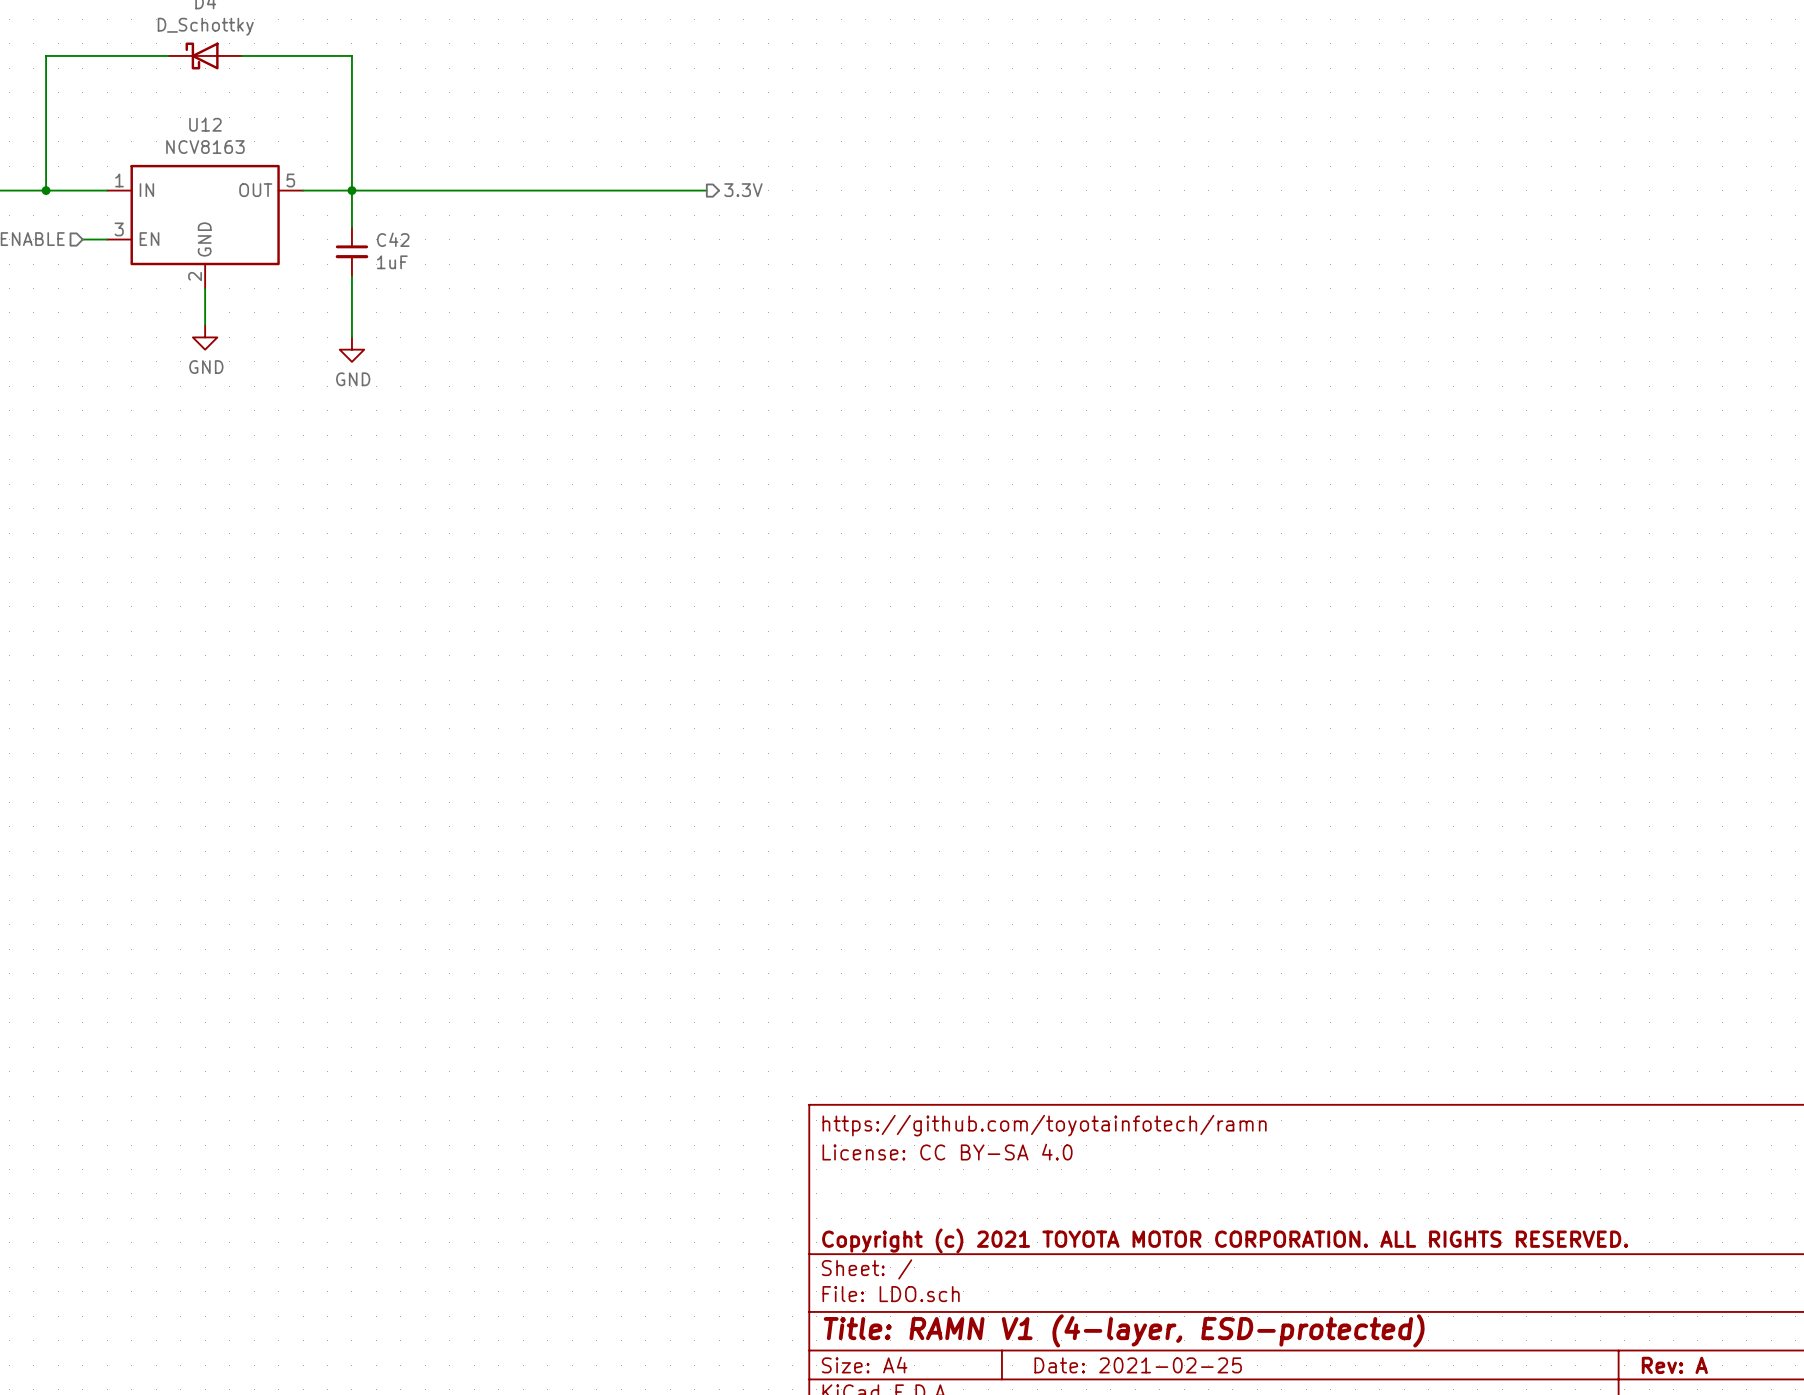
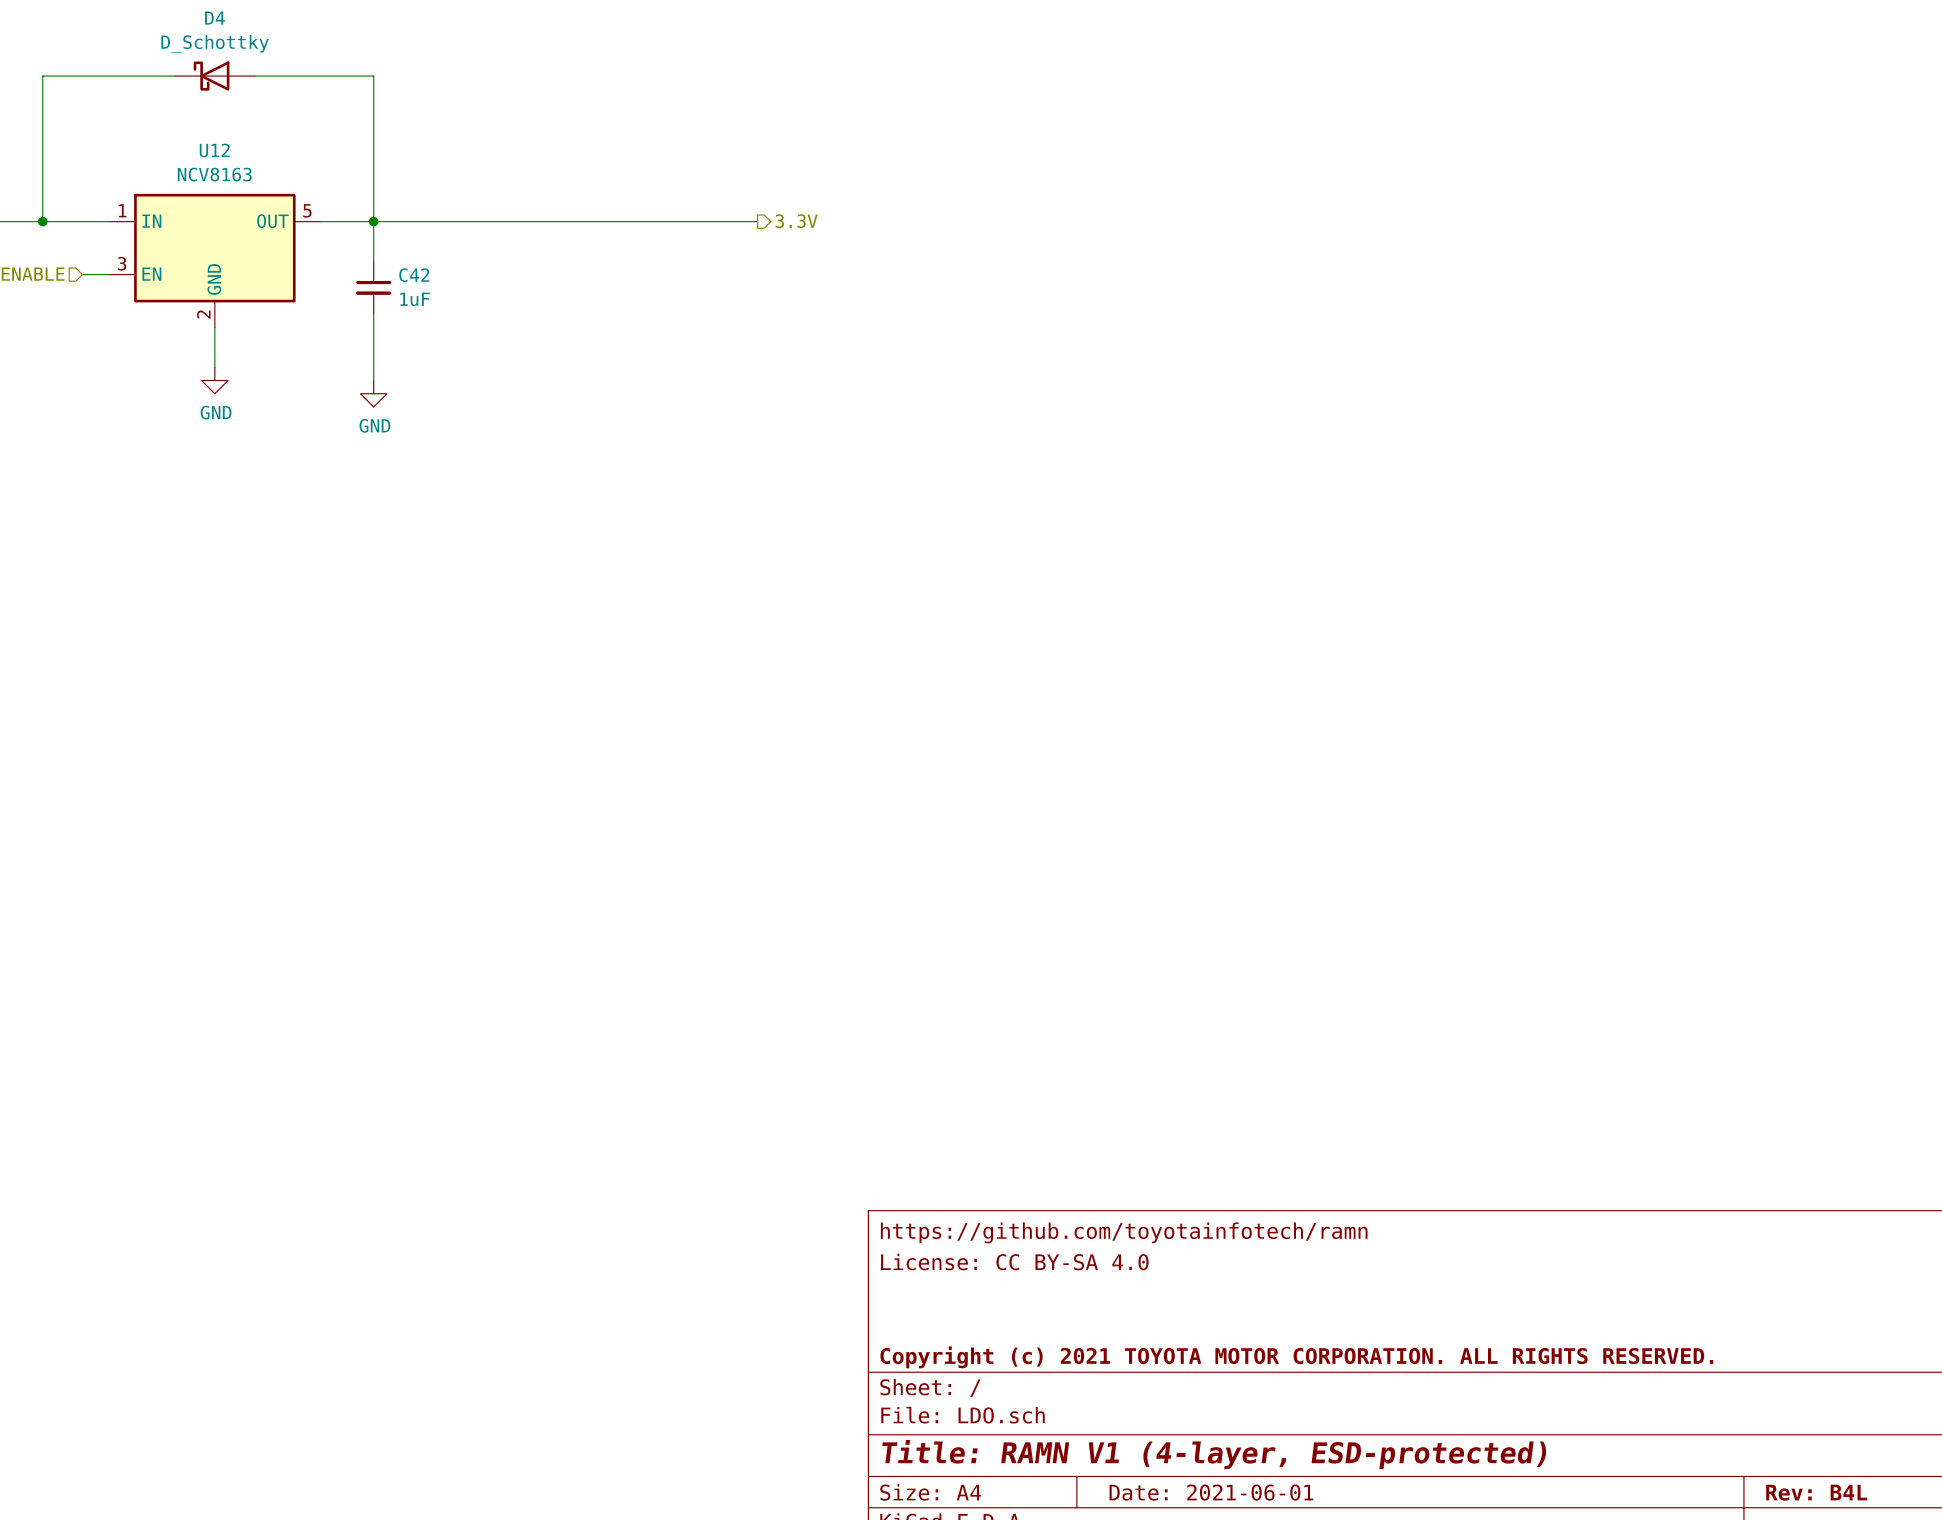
title block: Date: 2021-02-25 (1138, 1365) -> Date: 2021-06-01 (1211, 1492)
title block: Rev: A (1674, 1365) -> Rev: B4L (1816, 1492)

